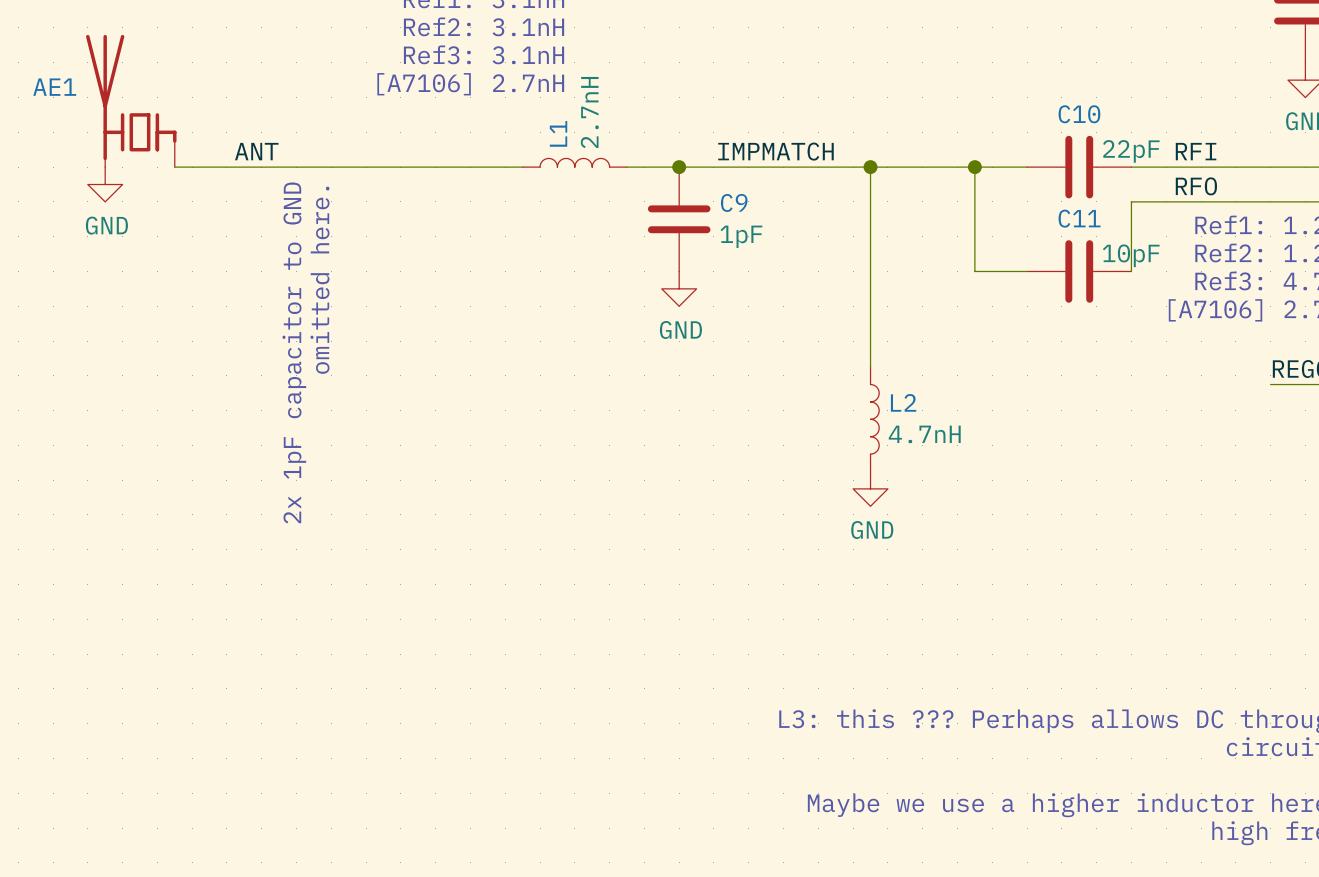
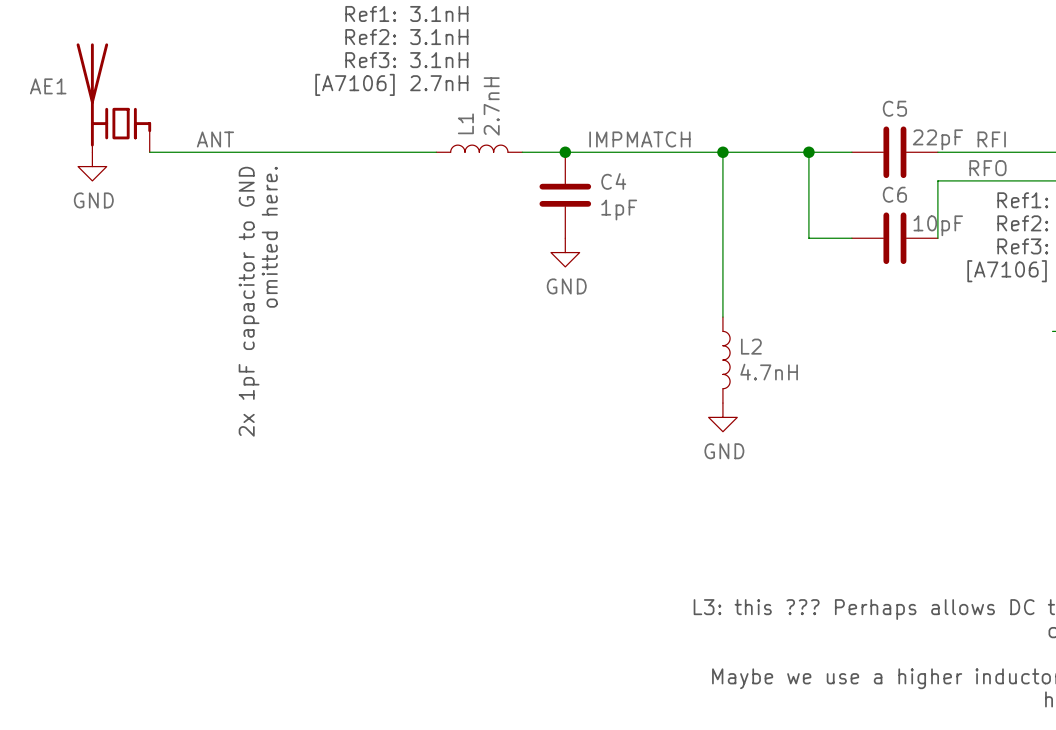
C10 name: C10 (1079, 114) -> C5 (894, 108)
C9 name: C9 (734, 202) -> C4 (613, 181)
C11 name: C11 (1079, 218) -> C6 (894, 194)

